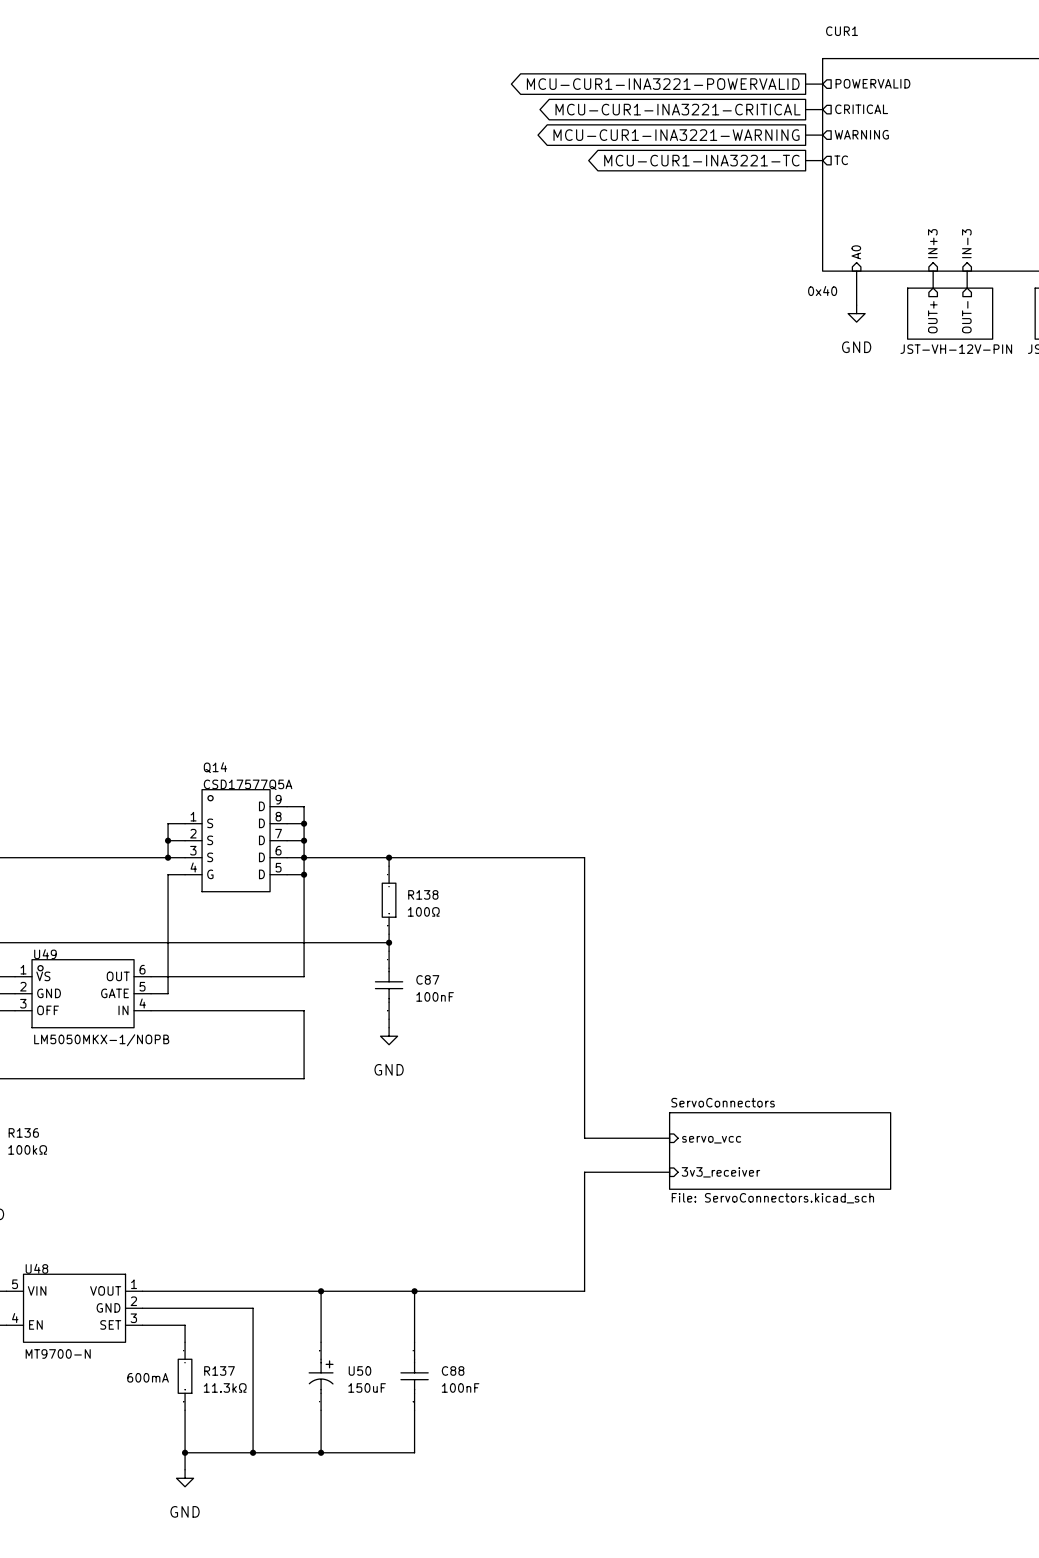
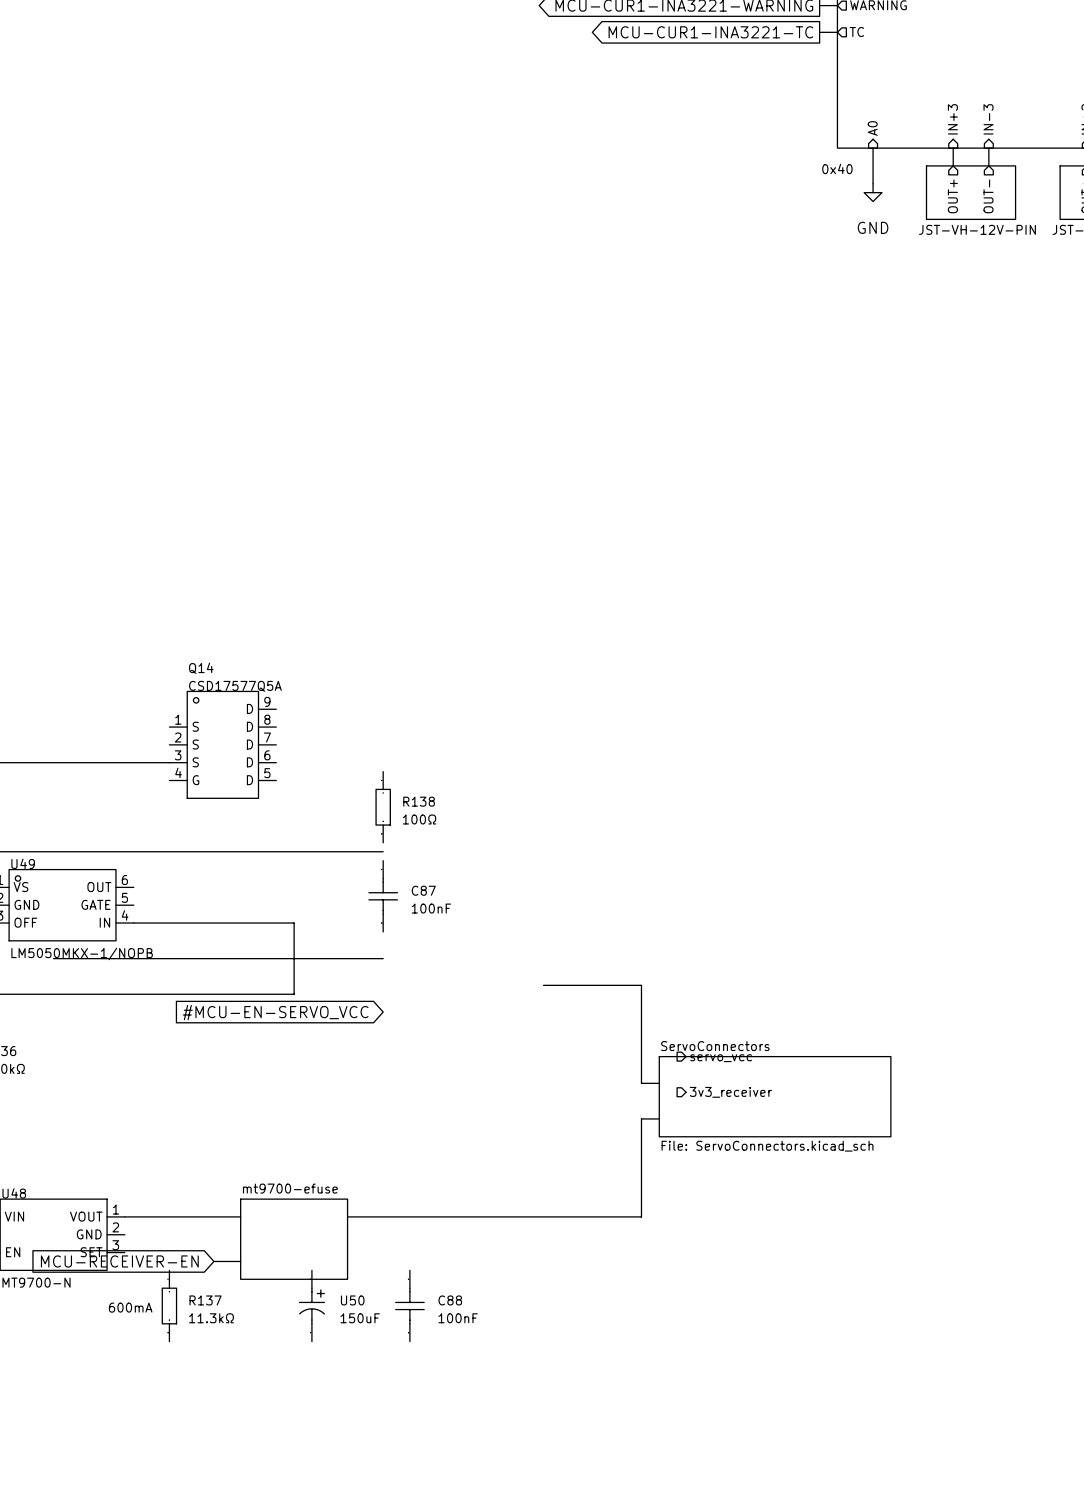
wire: (287, 806) (304, 806) (304, 976) (151, 976) -> none
wire: (185, 823) (168, 823) (168, 857) -> none
wire: (287, 823) (304, 823) -> none
junction: (304, 823) -> none
wire: (168, 840) (185, 840) -> none
junction: (168, 840) -> none
wire: (287, 840) (304, 840) -> none
junction: (304, 840) -> none
junction: (168, 857) -> none
wire: (287, 857) (584, 857) (584, 1138) (669, 1138) -> none
junction: (304, 857) -> none
wire: (389, 857) (389, 866) -> none
junction: (389, 857) -> none
wire: (185, 874) (168, 874) (168, 993) (151, 993) -> none
wire: (287, 874) (304, 874) -> none
junction: (304, 874) -> none
wire: (389, 934) (389, 951) -> none
junction: (389, 942) -> none
wire: (389, 1019) (389, 1027) -> none
power symbol: GND (389, 1036) -> none
wire: none -> (53, 958) (383, 958)
wire: none -> (543, 985) (641, 985) (641, 1083) (659, 1083)
global label: none -> #MCU-EN-SERVO_VCC (275, 1012)
sheet ServoConnectors position: (780, 1150) -> (775, 1096)
wire: (669, 1172) (584, 1172) (584, 1291) -> (659, 1118) (641, 1118) (641, 1216) (588, 1216)
wire: (253, 1291) (355, 1291) -> none
wire: (321, 1291) (321, 1342) -> none
junction: (321, 1291) -> none
wire: (414, 1291) (414, 1342) -> none
junction: (414, 1291) -> none
wire: (142, 1308) (253, 1308) (253, 1452) -> none
sheet mt9700-efuse: none -> (294, 1239)
wire: (142, 1325) (185, 1325) (185, 1342) -> none
global label: none -> MCU-RECEIVER-EN (119, 1261)
wire: none -> (213, 1261) (240, 1261)
wire: (185, 1410) (185, 1469) -> none
wire: (321, 1410) (321, 1452) -> none
wire: (414, 1410) (414, 1452) (185, 1452) -> none
junction: (185, 1452) -> none
junction: (253, 1452) -> none
junction: (321, 1452) -> none
power symbol: GND (185, 1478) -> none

